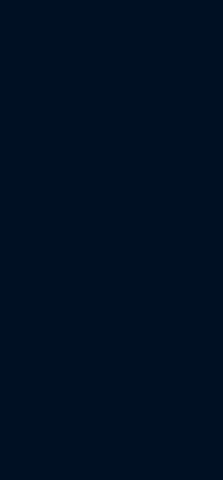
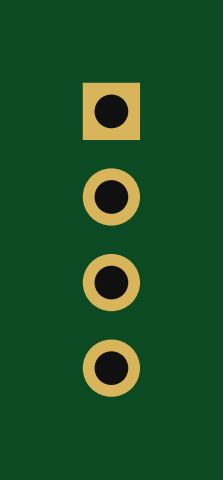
part: none -> (111, 239)

